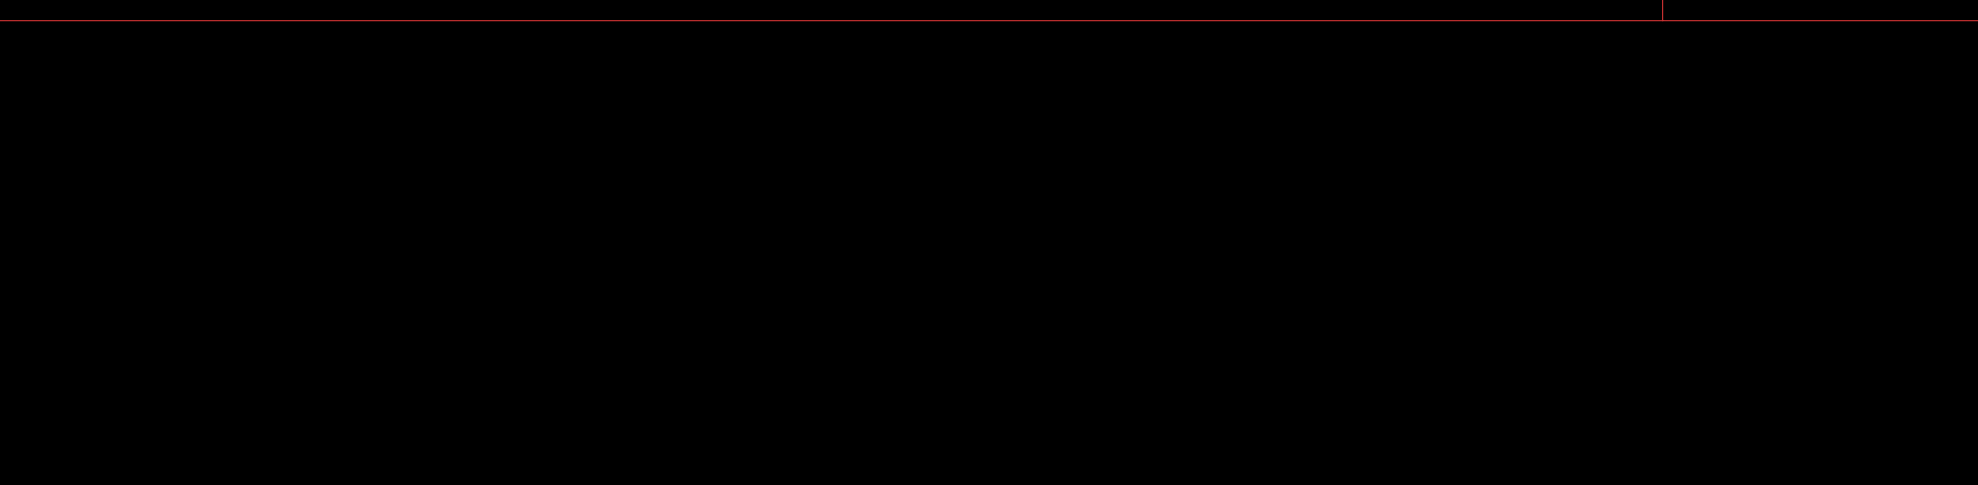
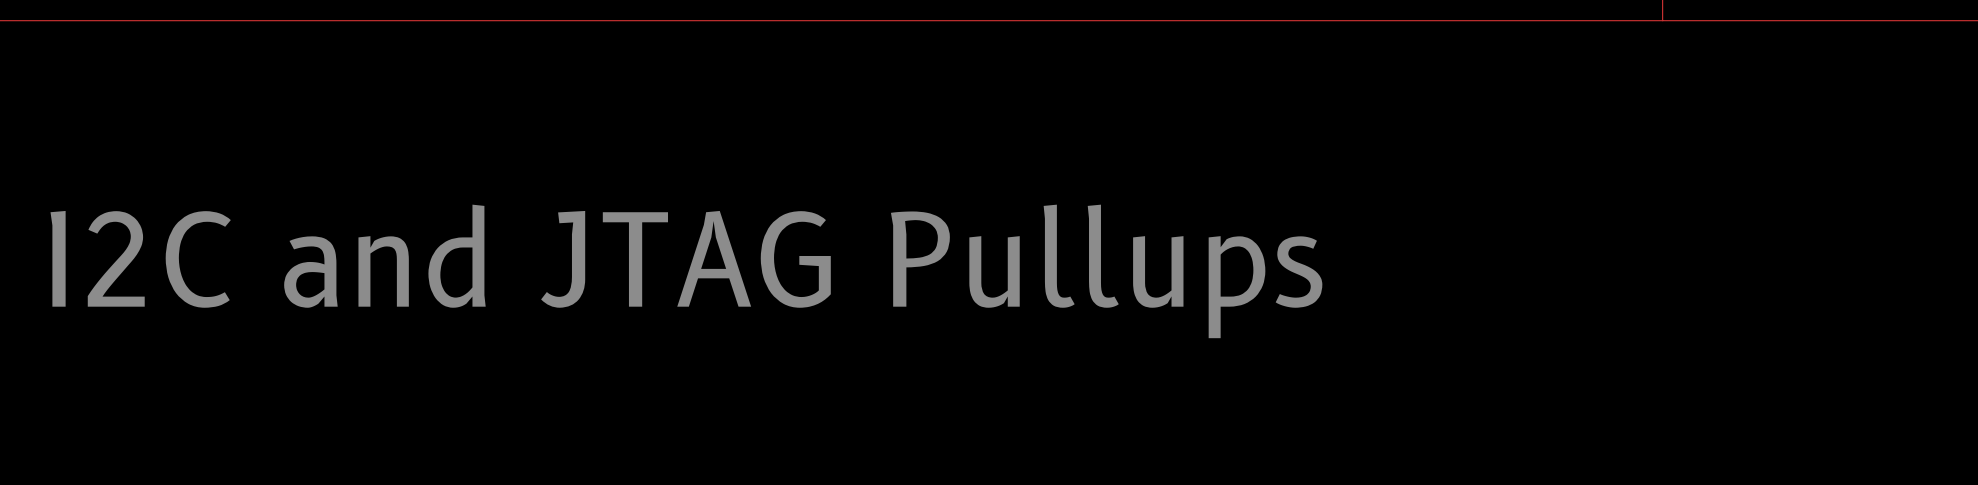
text: none -> I2C and JTAG Pullups (686, 271)

